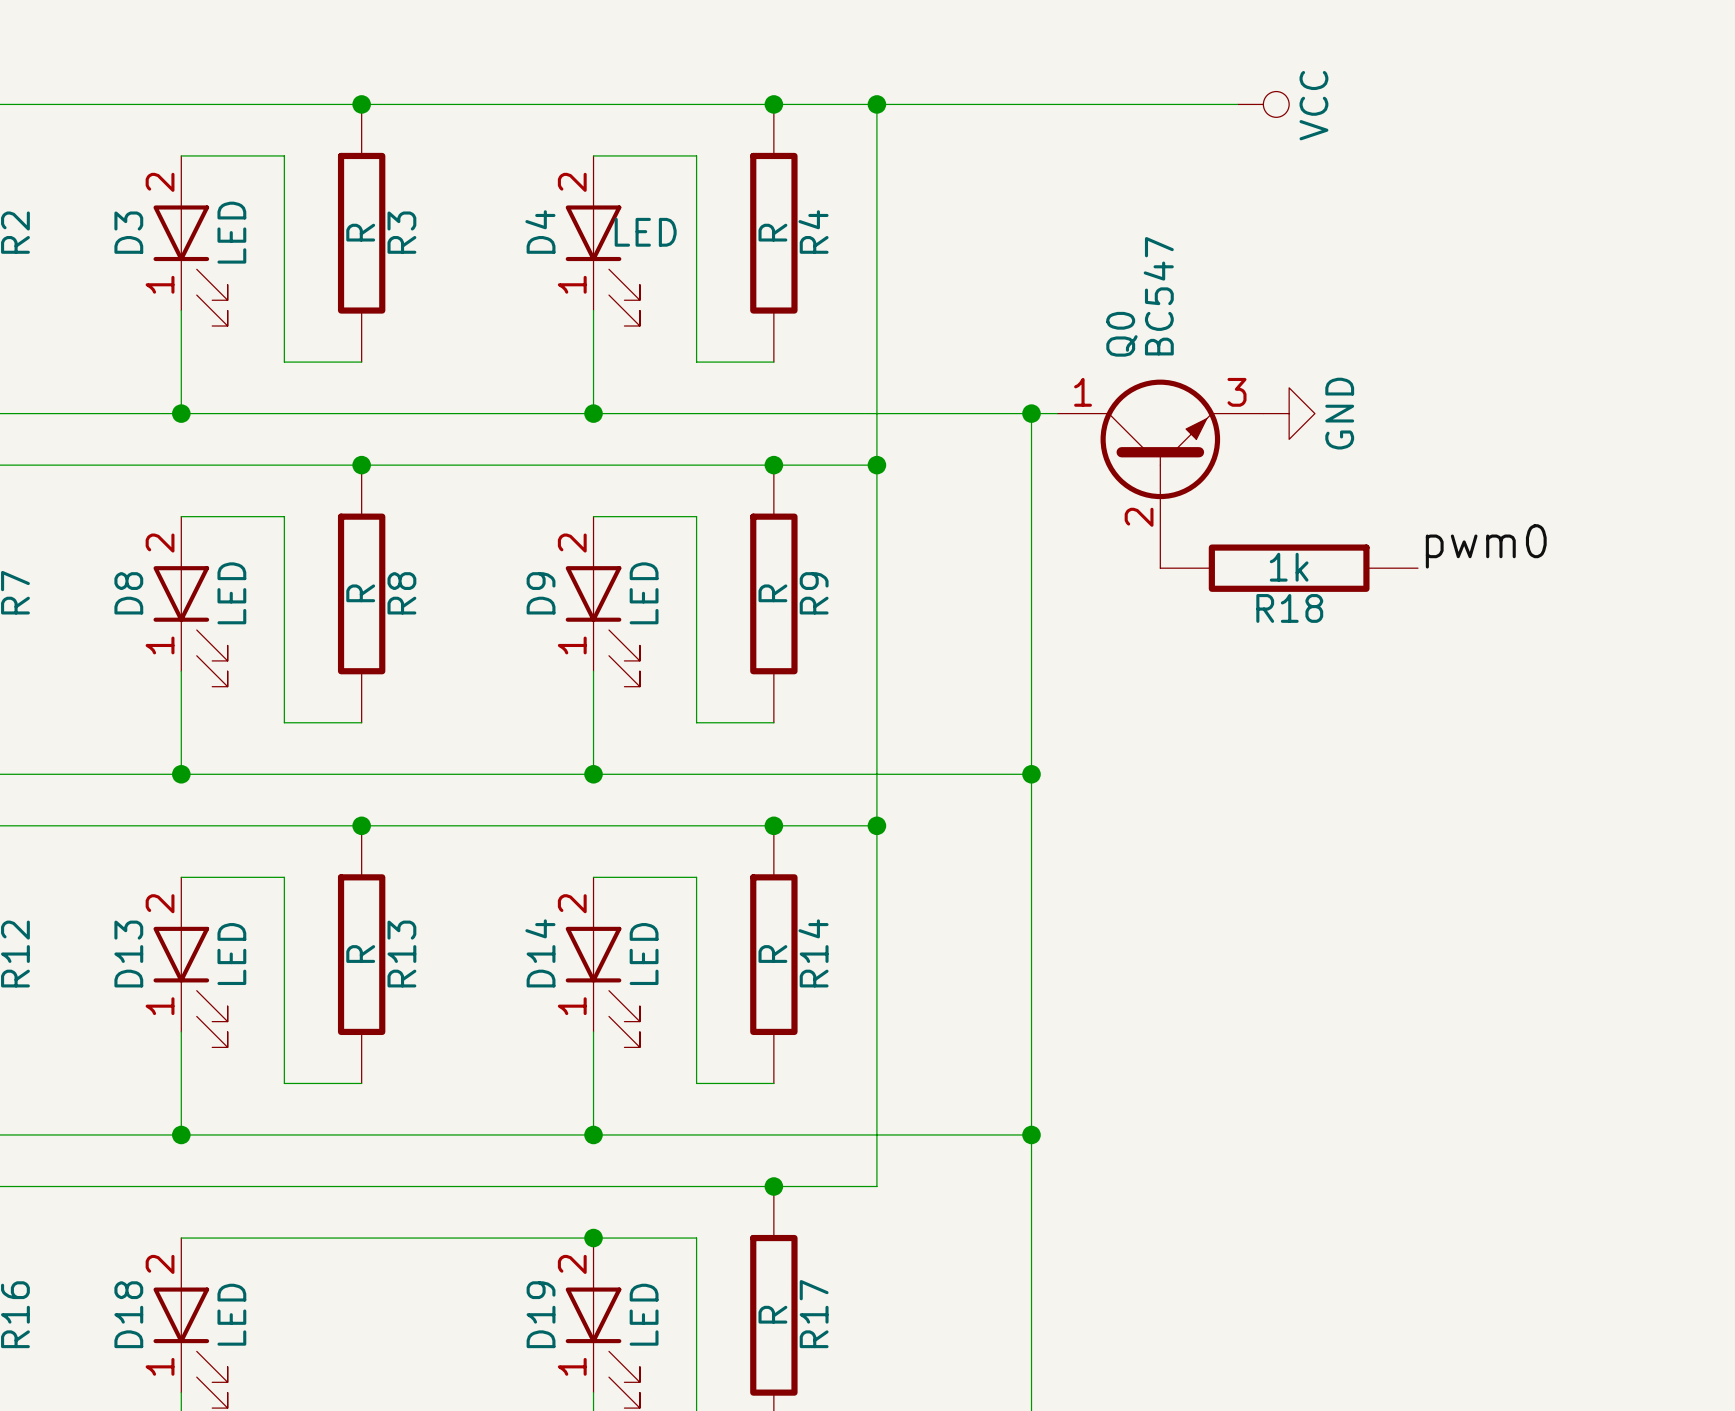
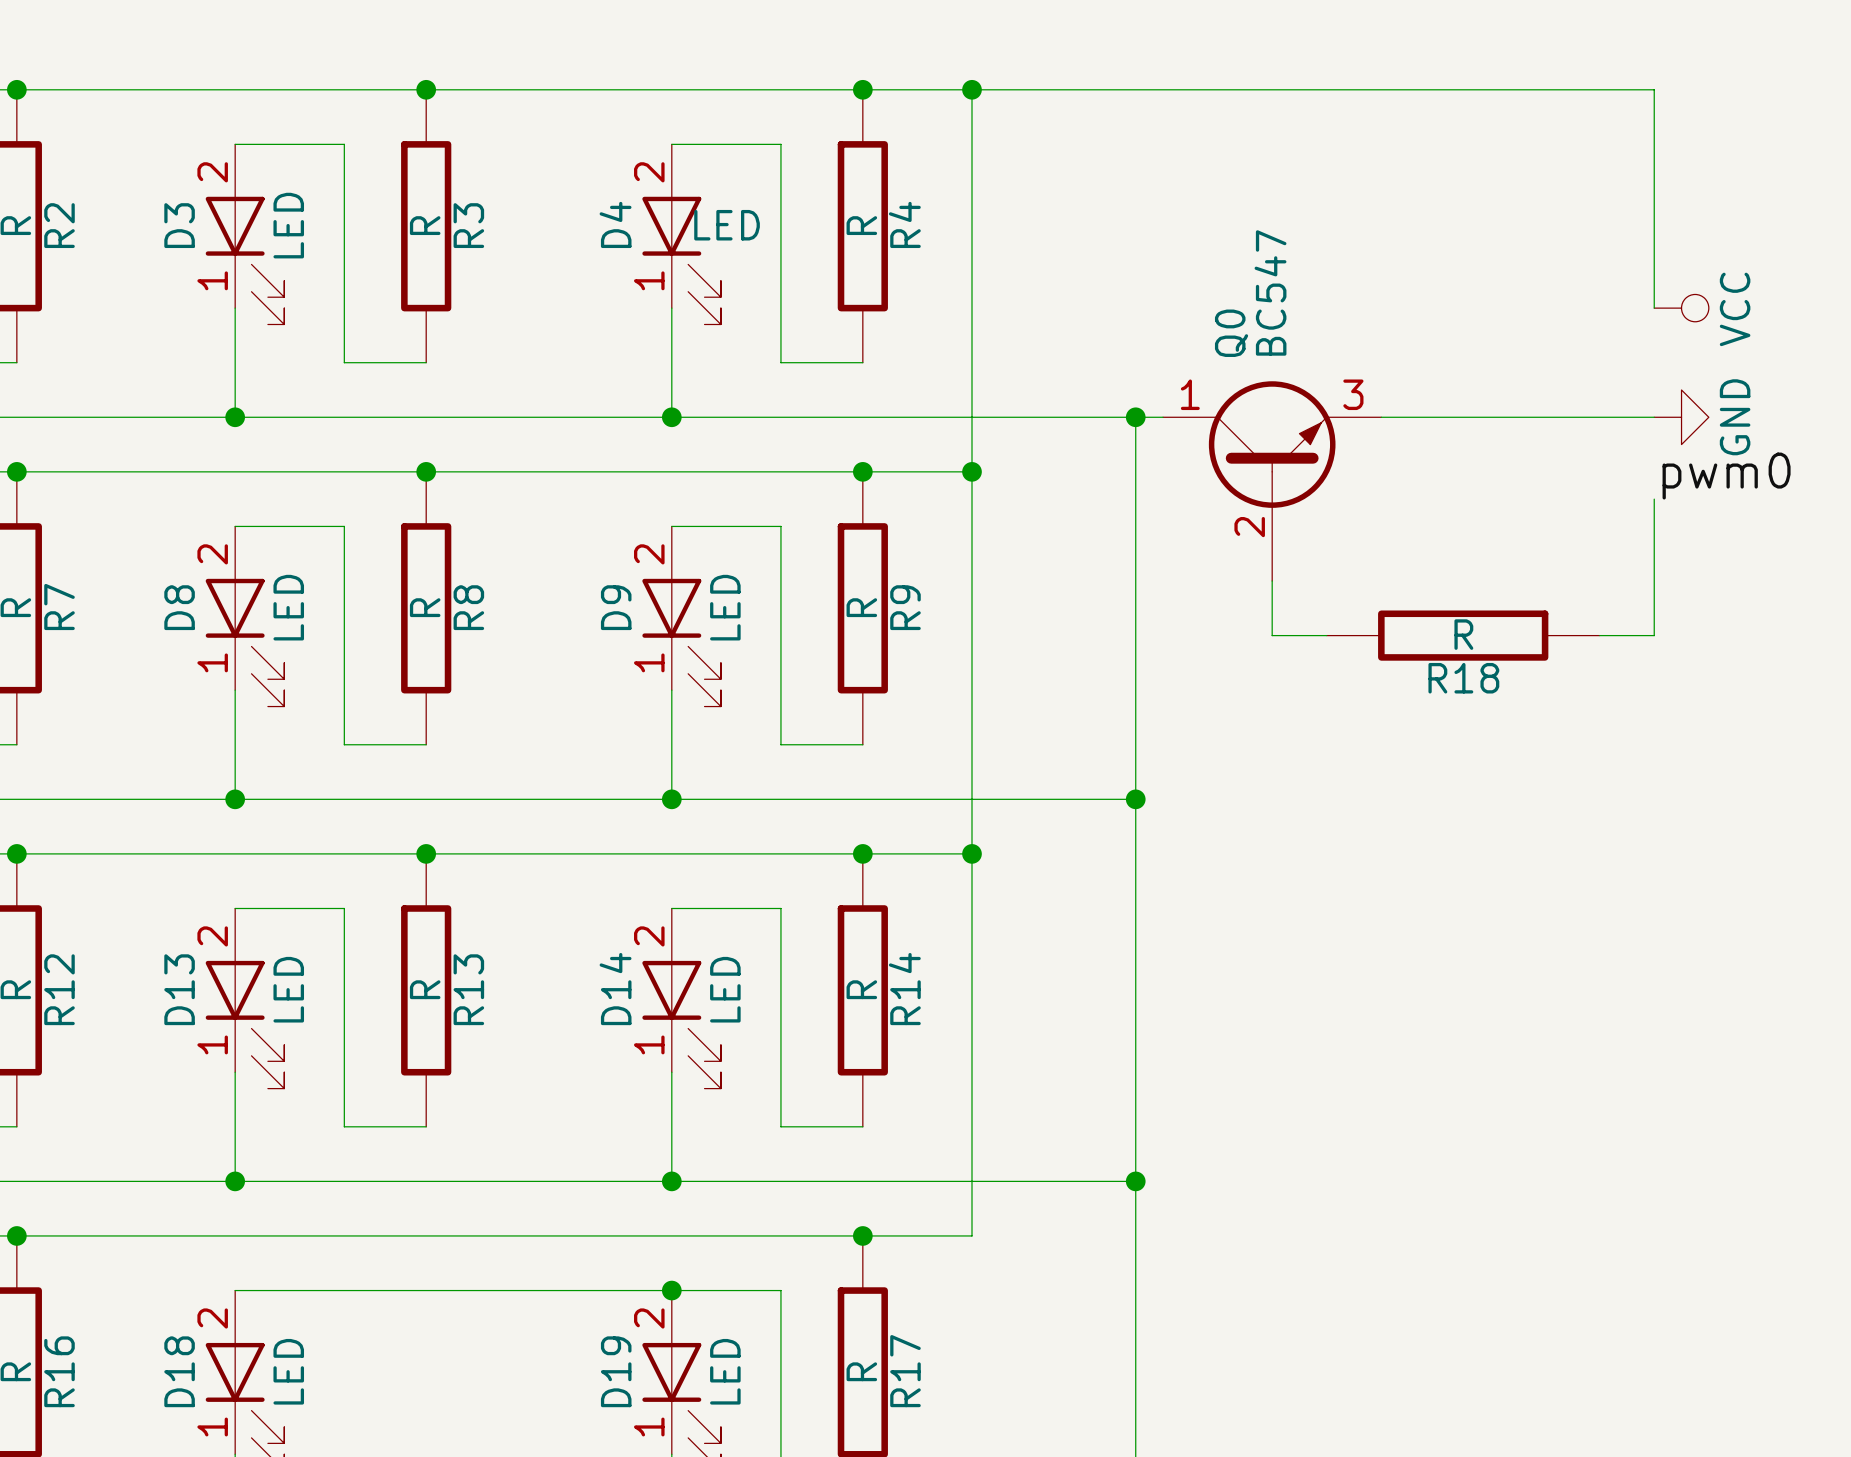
wire: none -> (1354, 89) (1654, 89) (1654, 308)
power symbol position: VCC (1263, 104) -> VCC (1681, 308)
wire: none -> (1381, 417) (1654, 417)
power symbol position: GND (1289, 413) -> GND (1681, 417)
wire: none -> (1654, 499) (1654, 635) (1599, 635)
label position: pwm0 (1486, 546) -> pwm0 (1726, 476)
R18 value: 1k (1289, 567) -> R (1463, 634)
wire: none -> (1272, 581) (1272, 635) (1326, 635)
R18 position: (1289, 568) -> (1463, 635)

